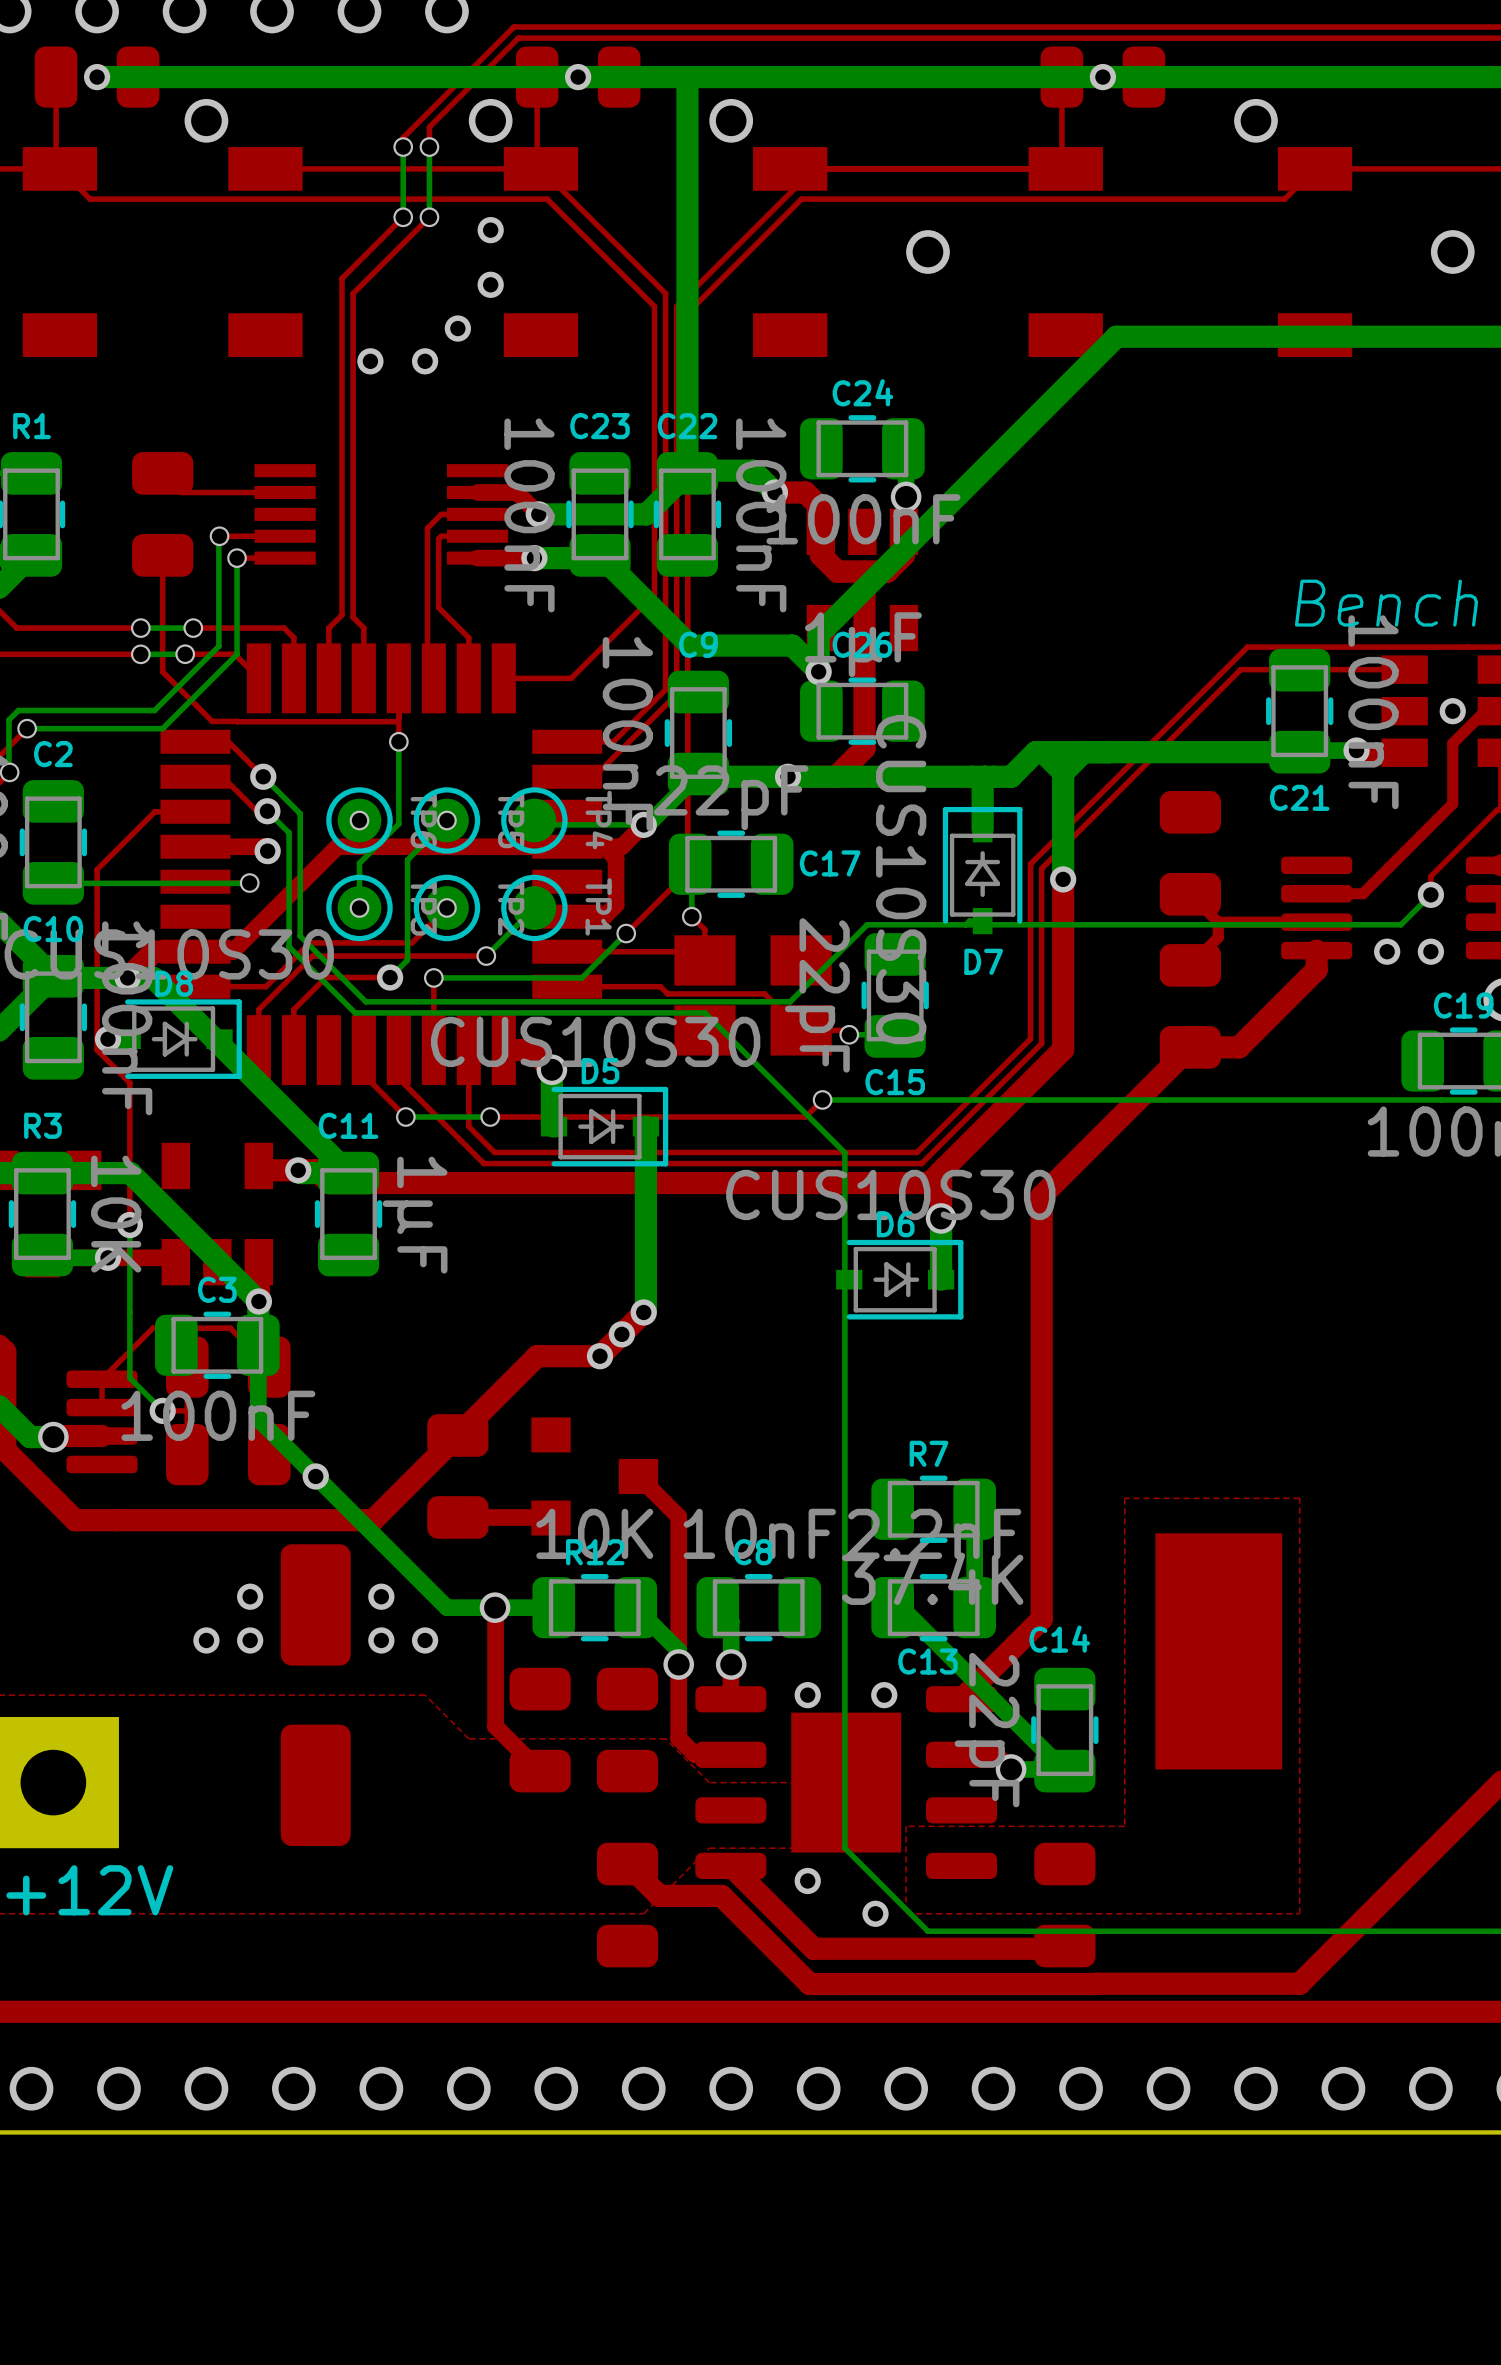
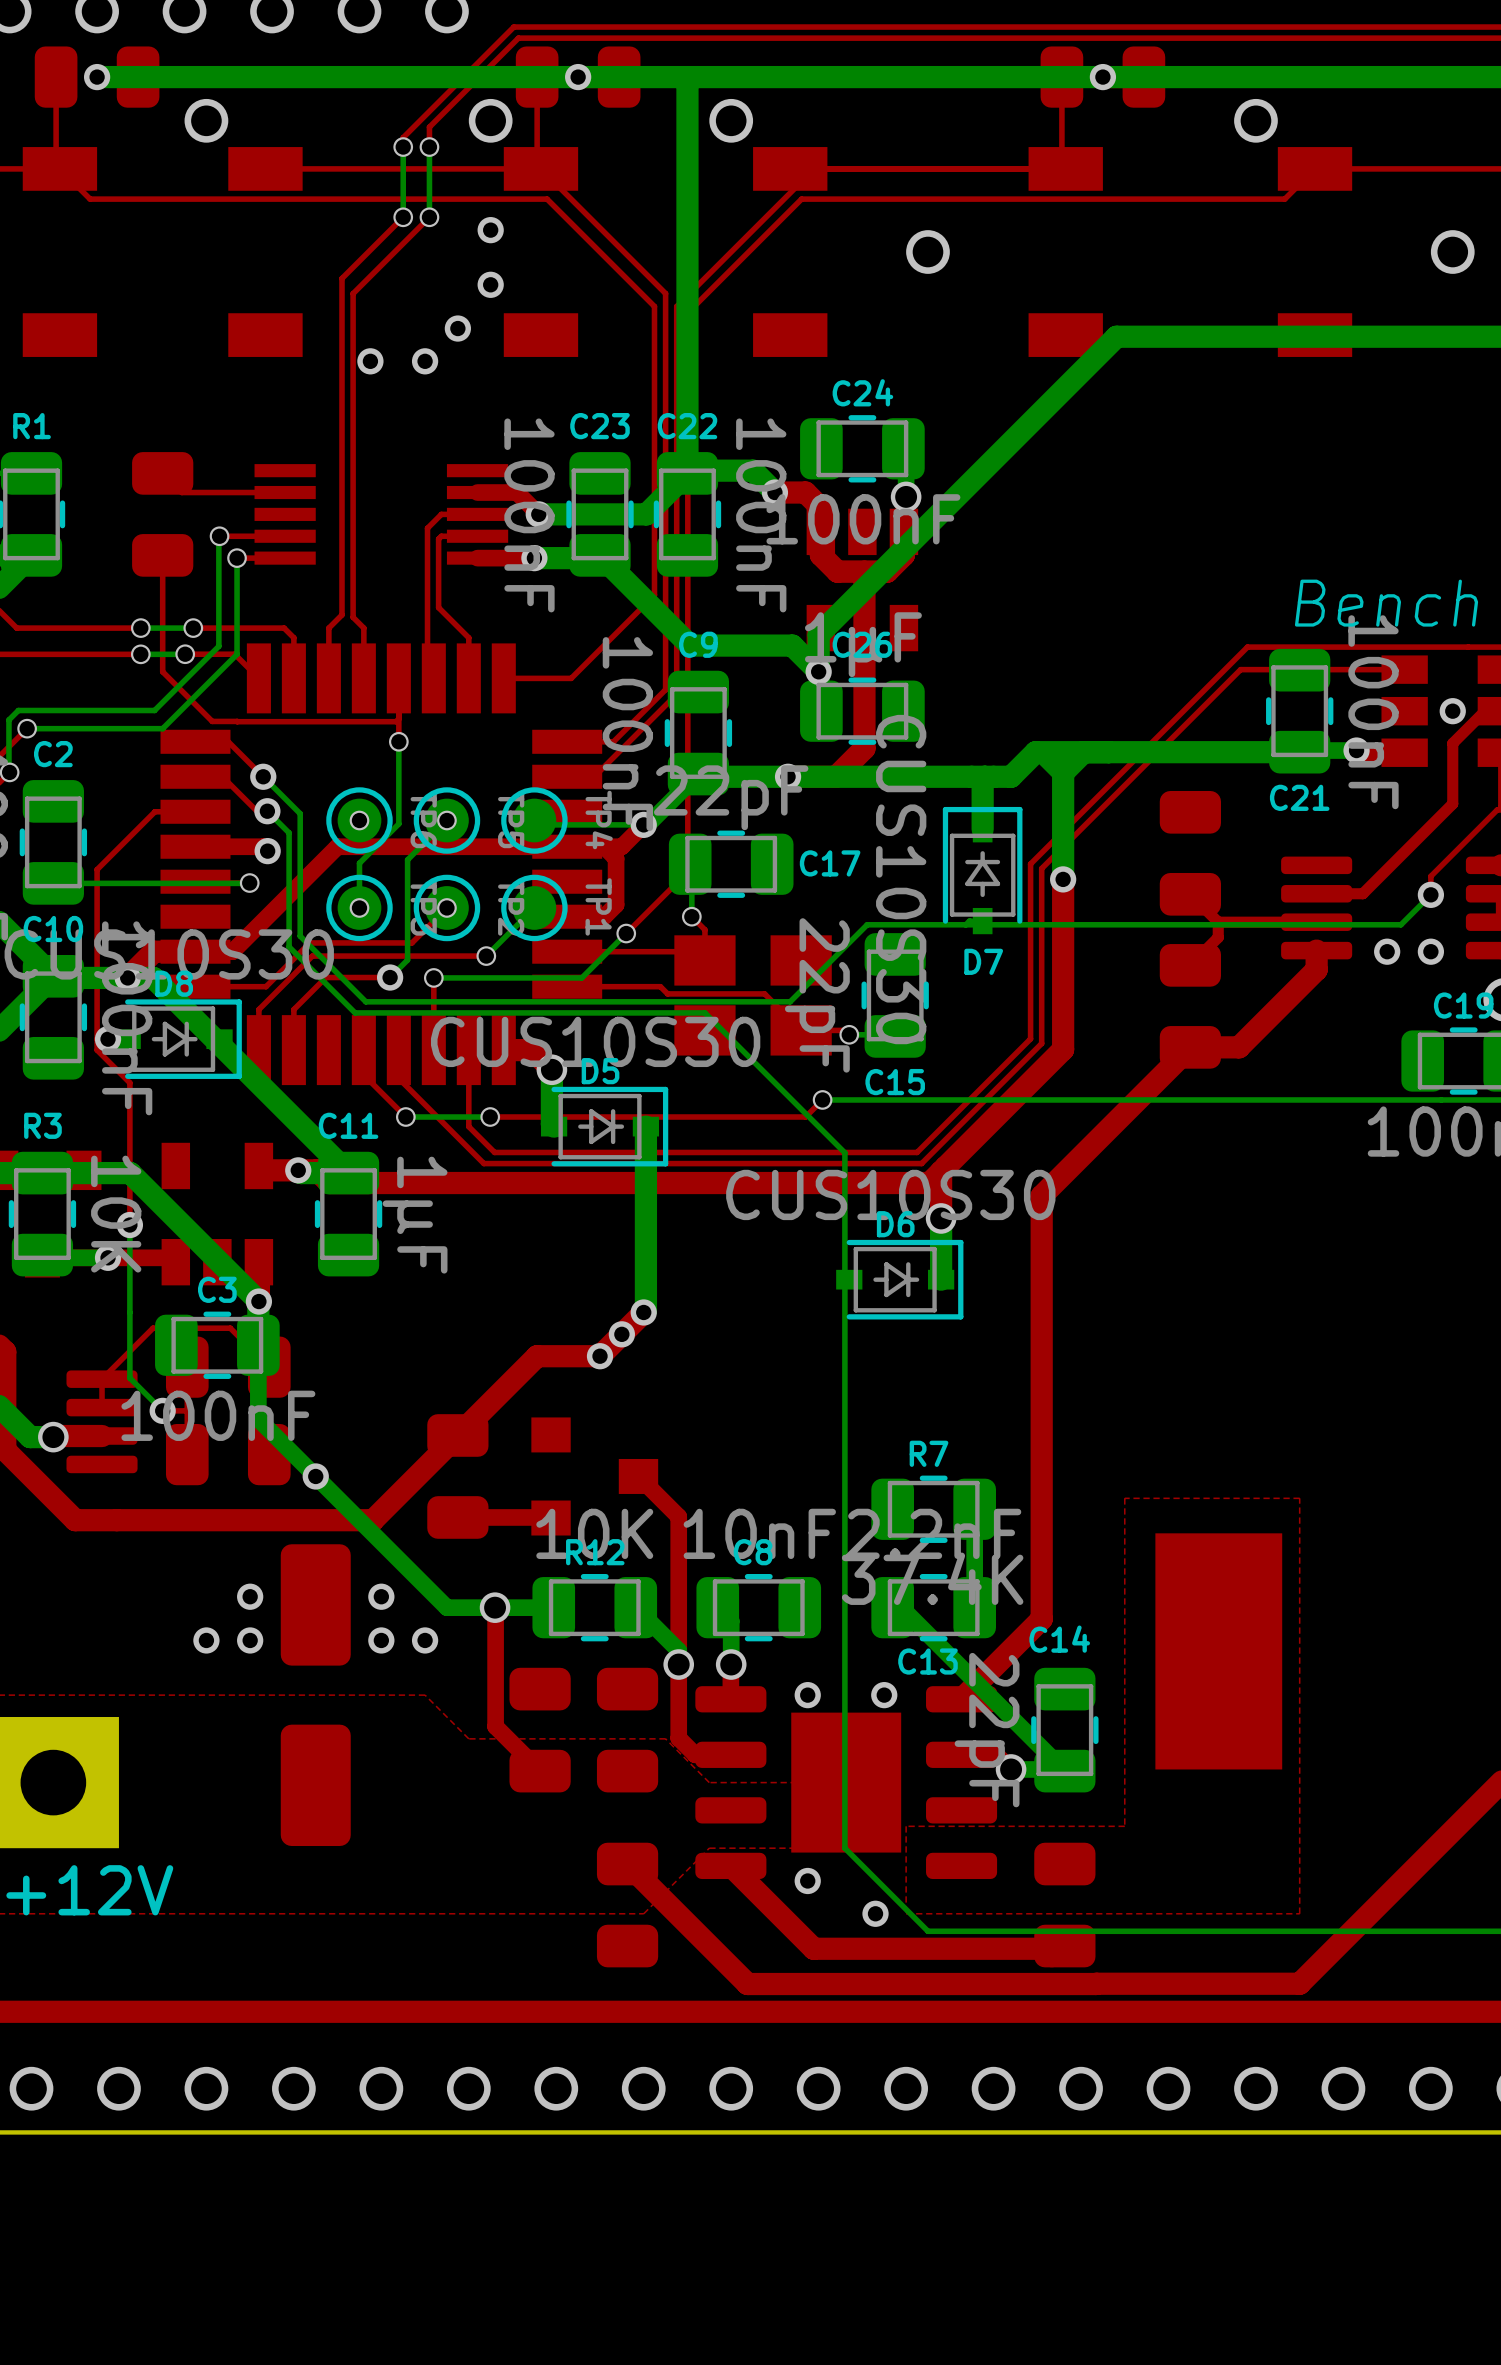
top track: (659, 1895) (721, 1895) (809, 1984) -> (659, 1895) (747, 1984) (809, 1984)

